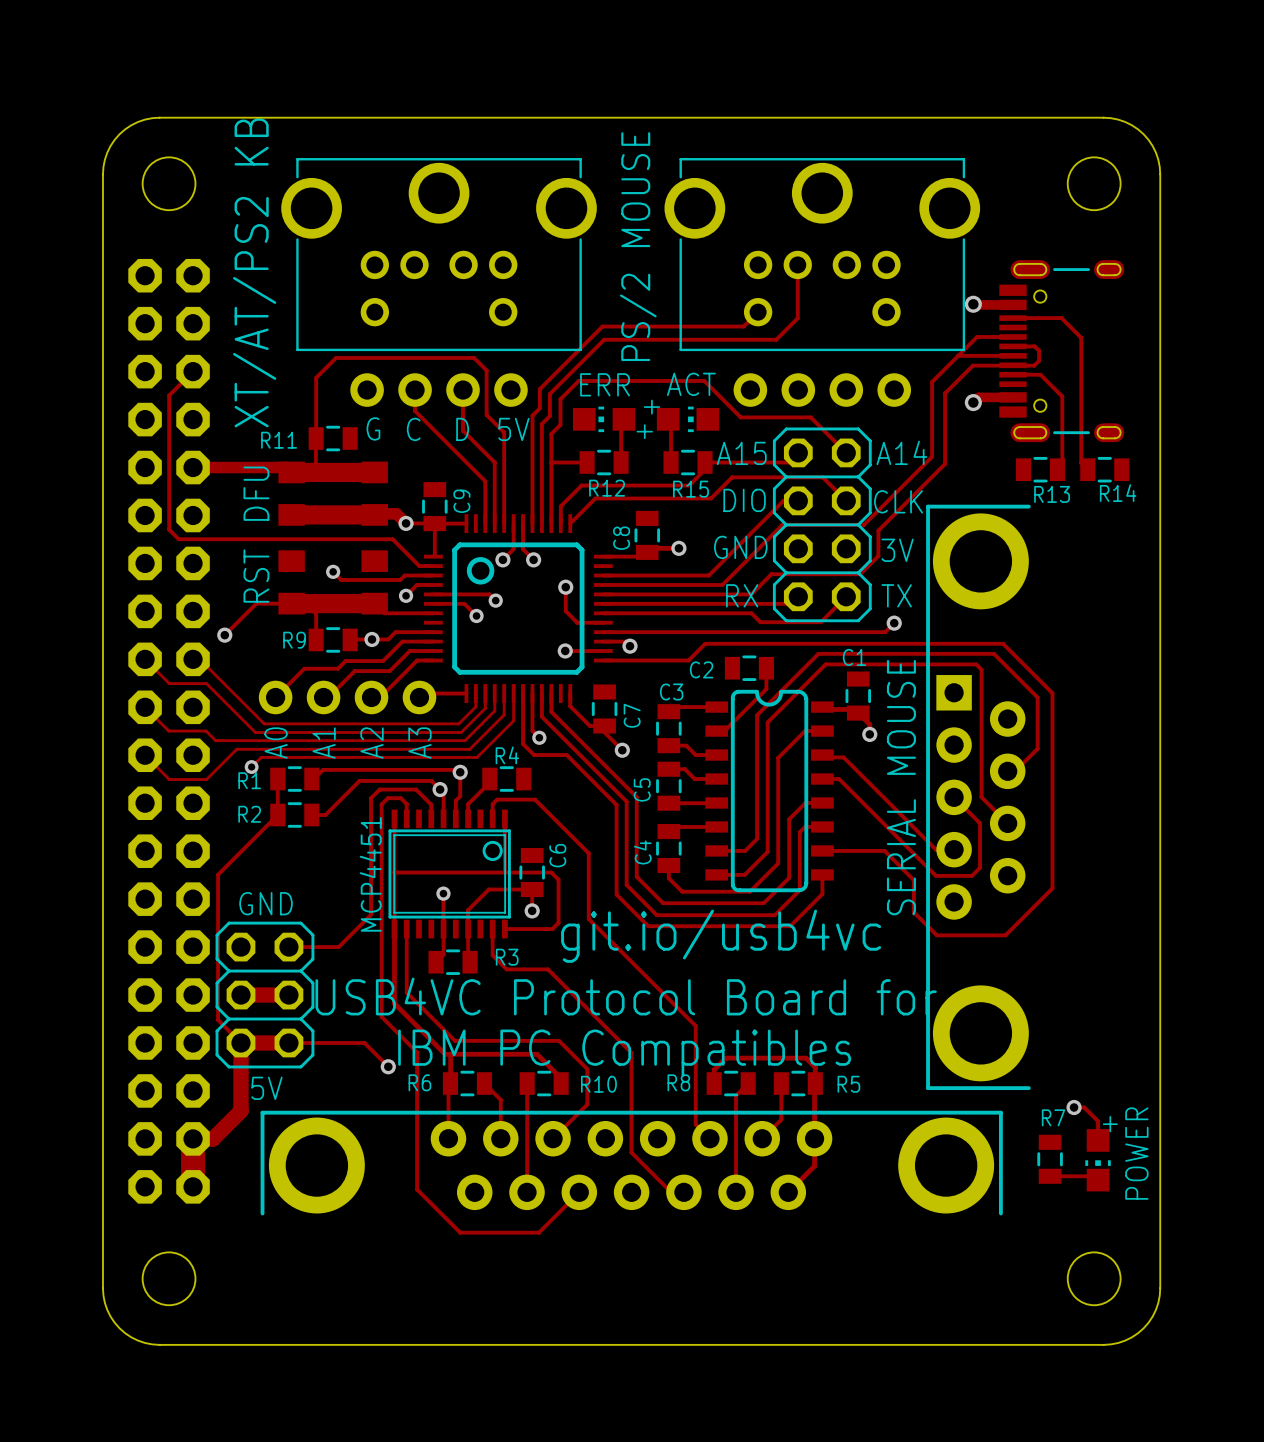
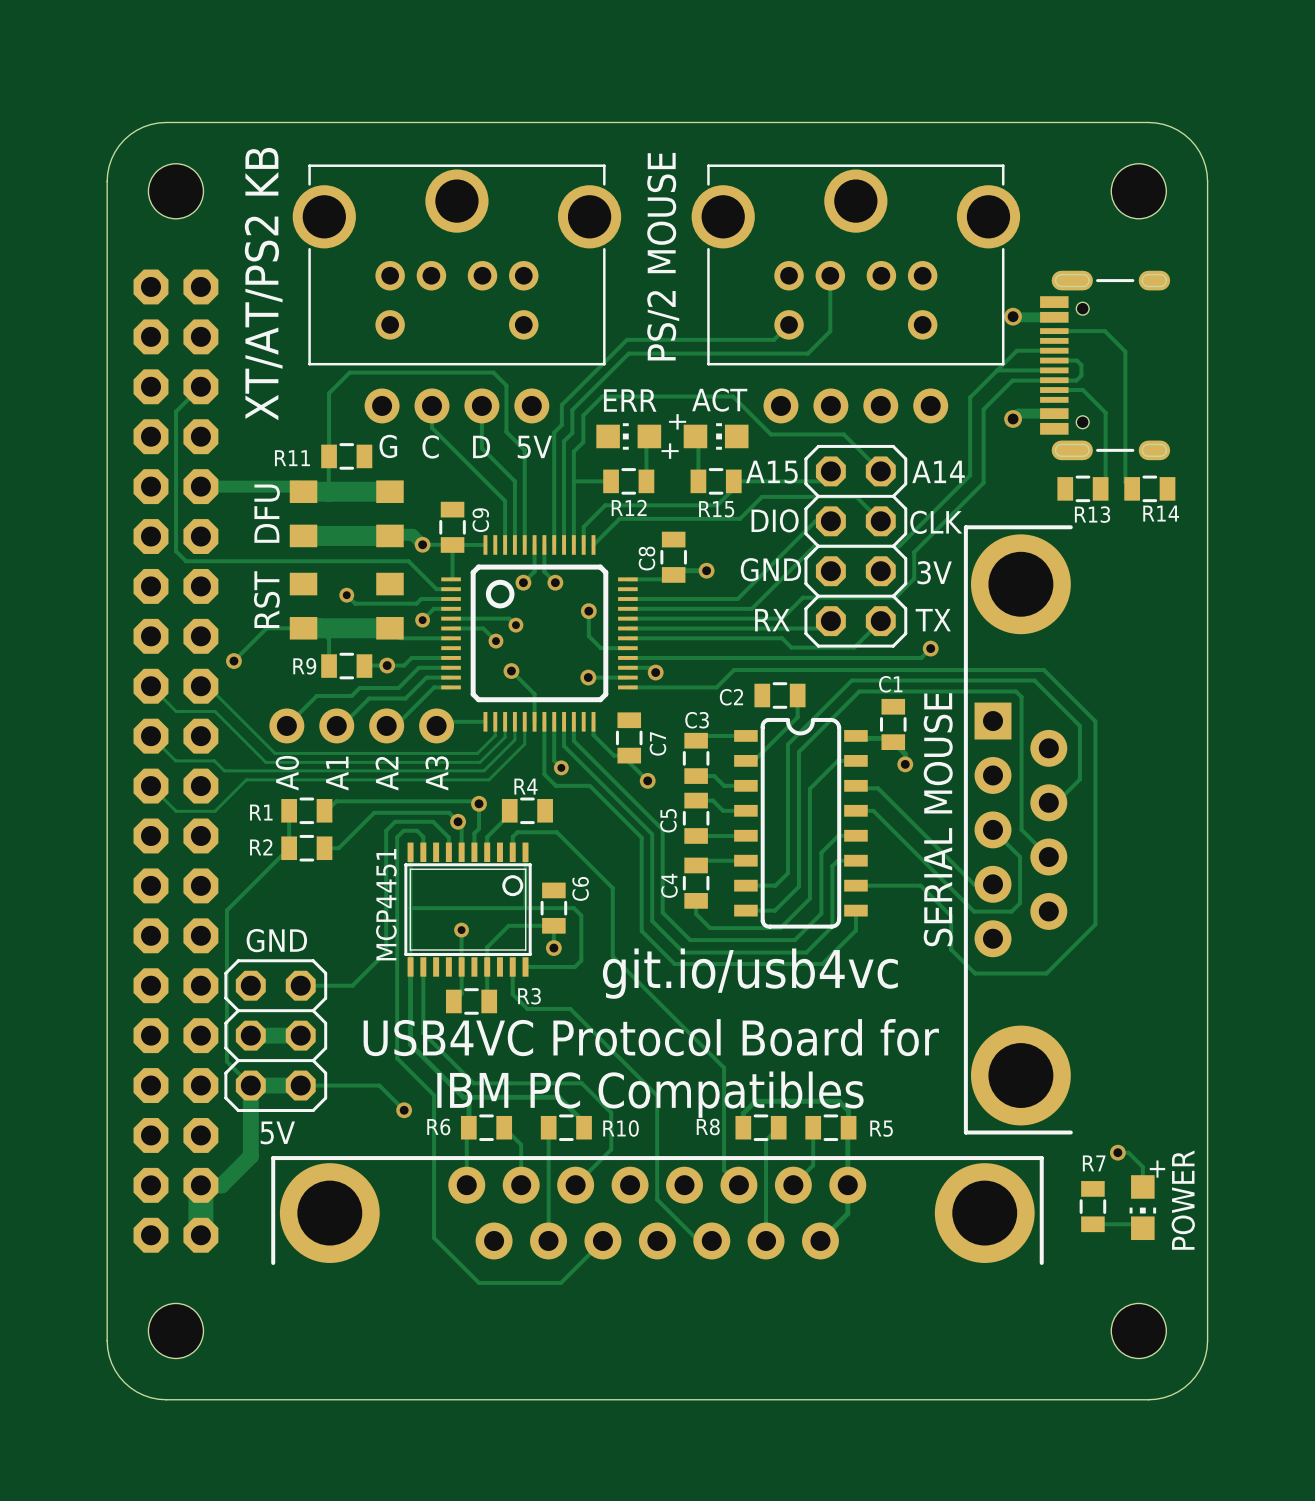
via: none -> (511, 671)
track: (513, 693) (513, 720) (477, 757) (261, 757) (251, 767) -> (534, 721) (534, 694) (511, 671)
via: (251, 767) -> none

